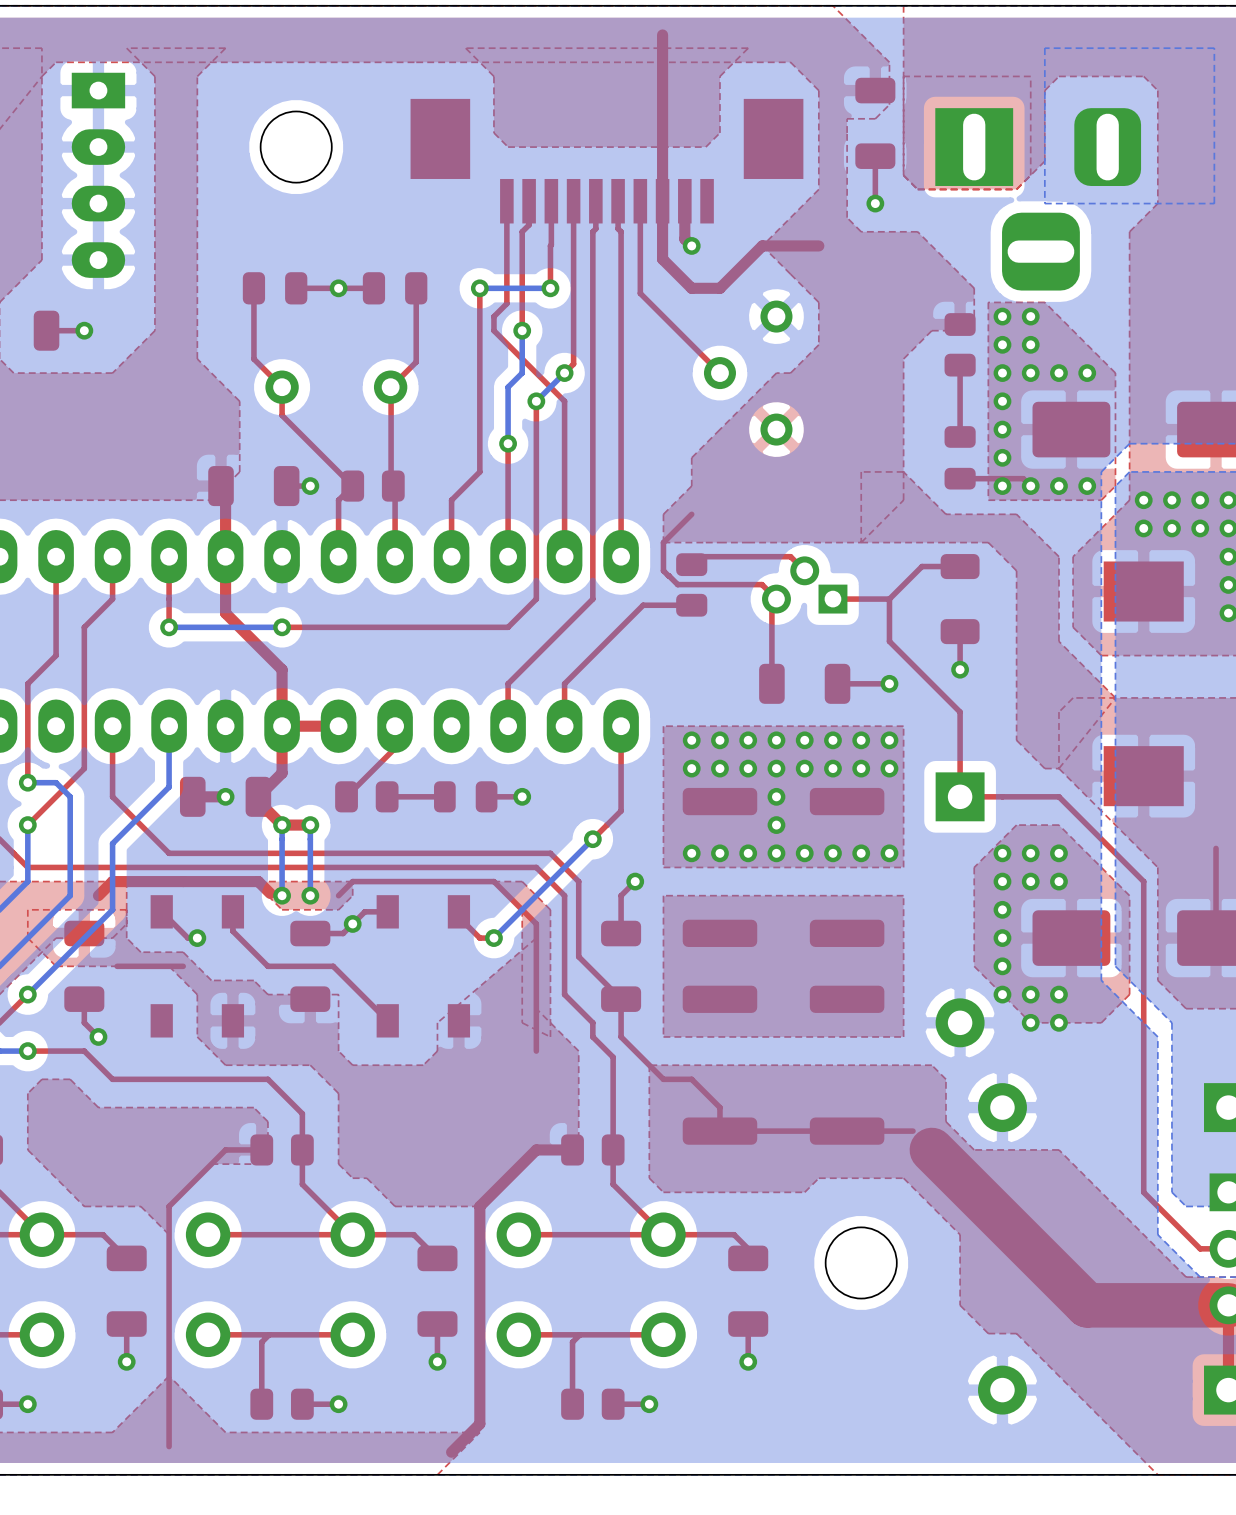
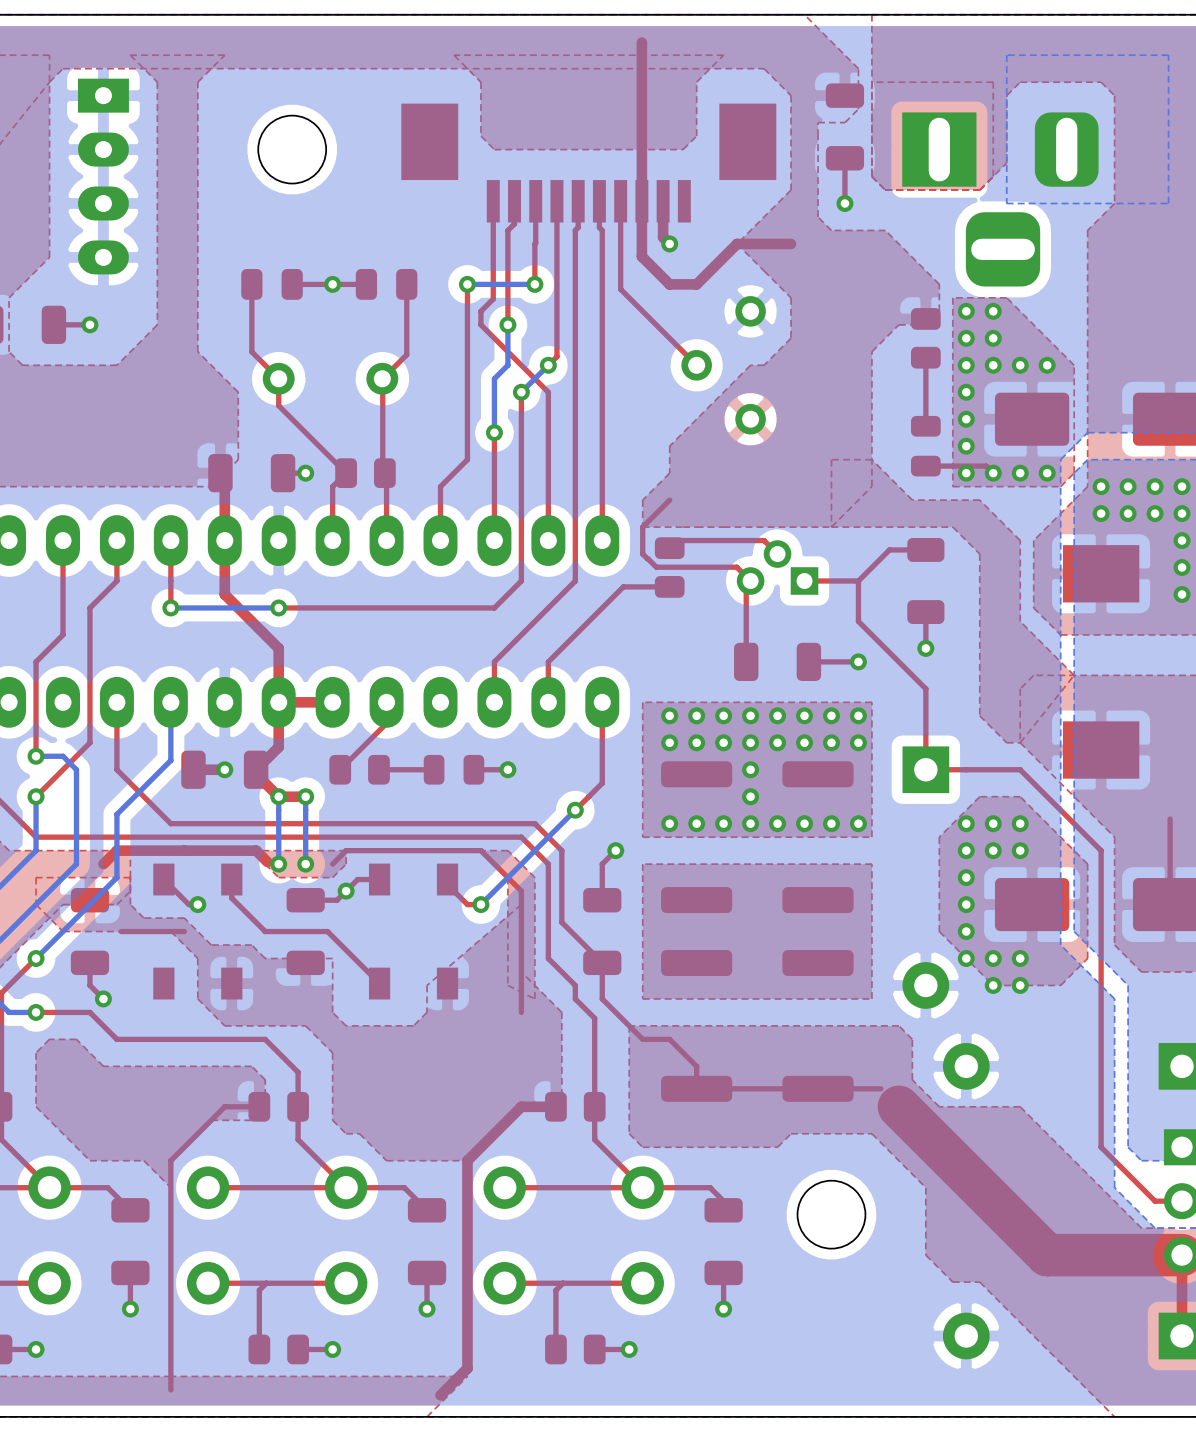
top zone outline: (225, 1432) (169, 1375) (112, 1432) -> (224, 1376) (116, 1376)

